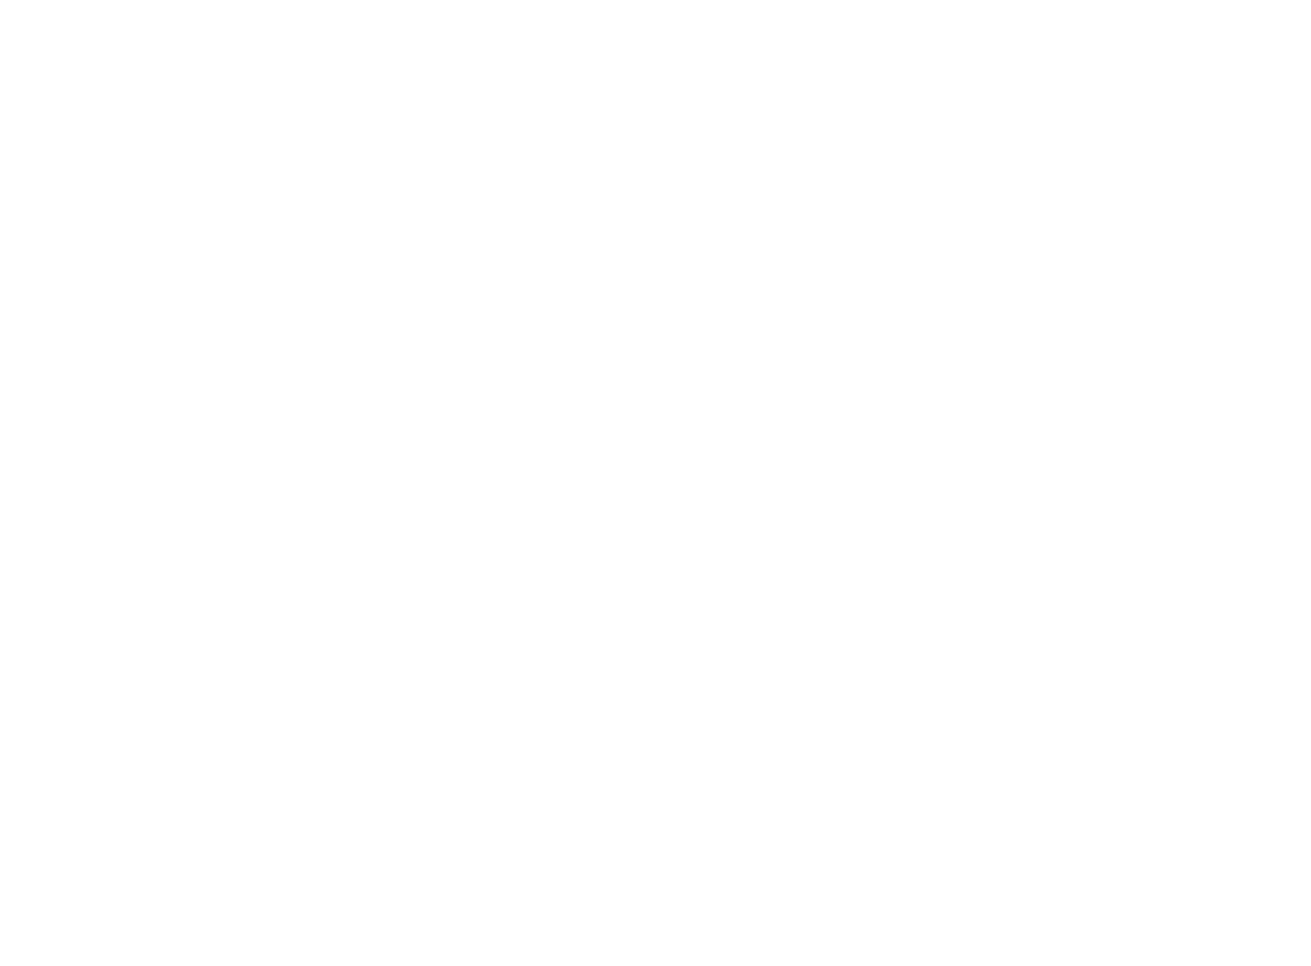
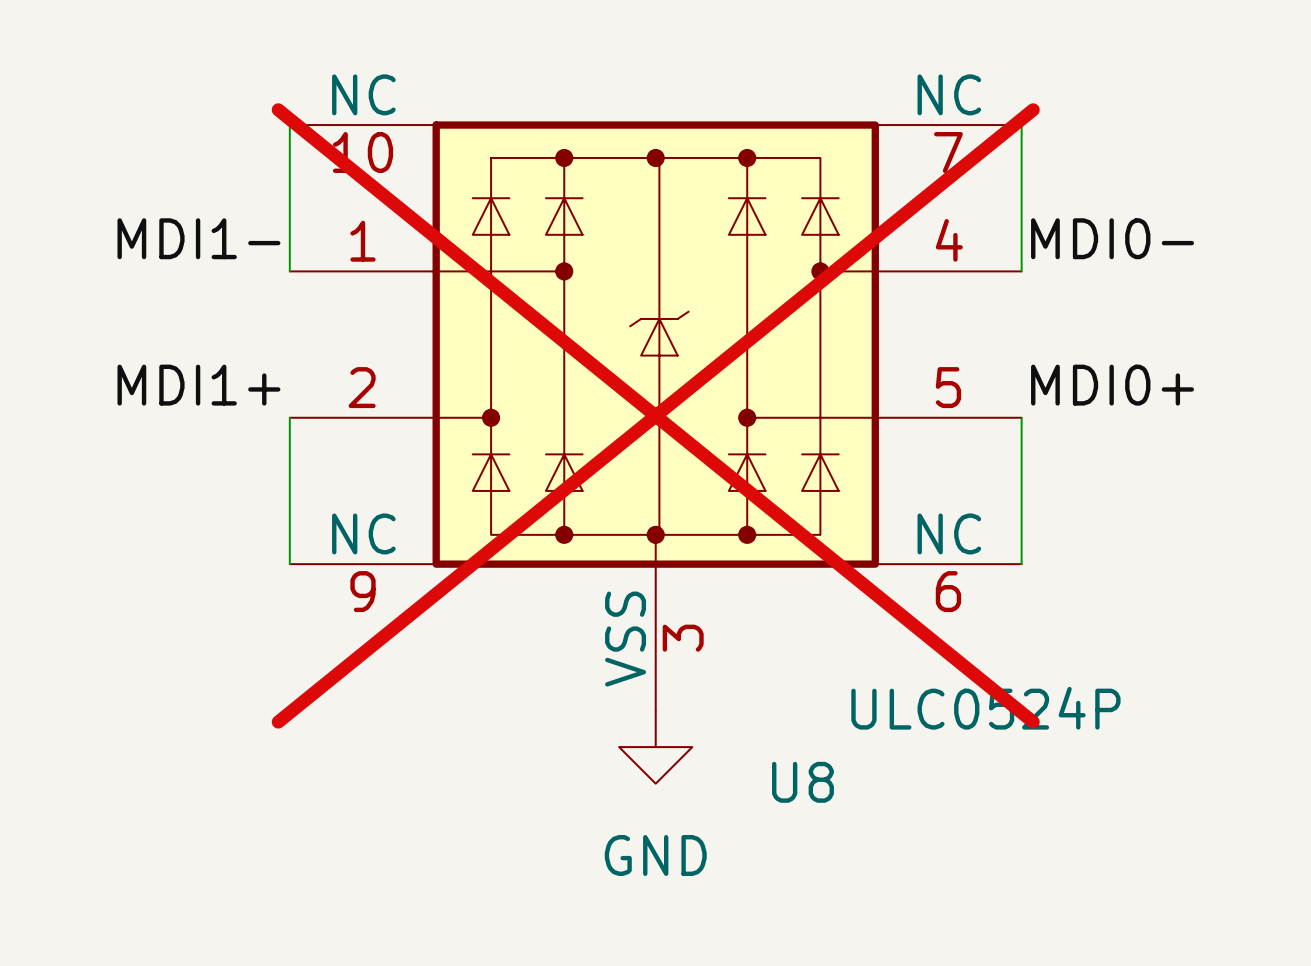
wire: none -> (289, 125) (289, 271)
wire: none -> (1021, 125) (1021, 271)
label: none -> MDI1- (198, 238)
label: none -> MDI0- (1112, 238)
label: none -> MDI1+ (198, 385)
label: none -> MDI0+ (1112, 385)
U8: none -> ULC0524P (655, 415)
wire: none -> (289, 417) (289, 564)
wire: none -> (1021, 417) (1021, 564)
power symbol: none -> GND (655, 747)

